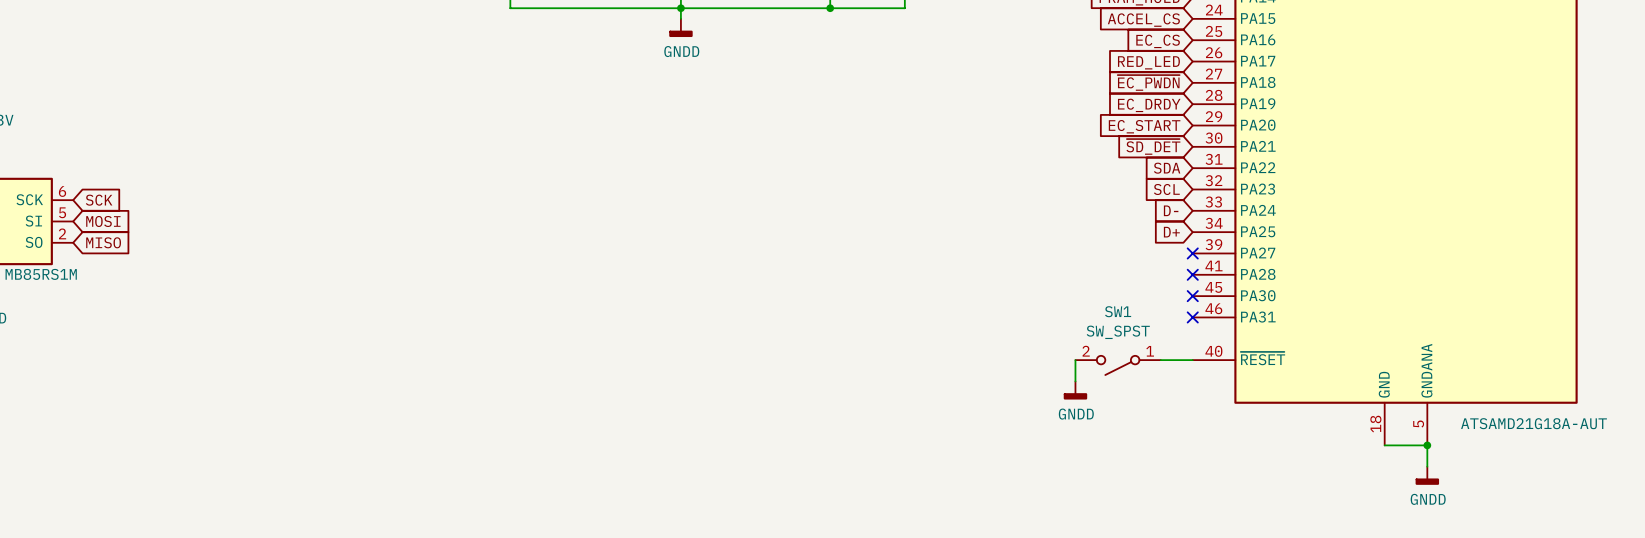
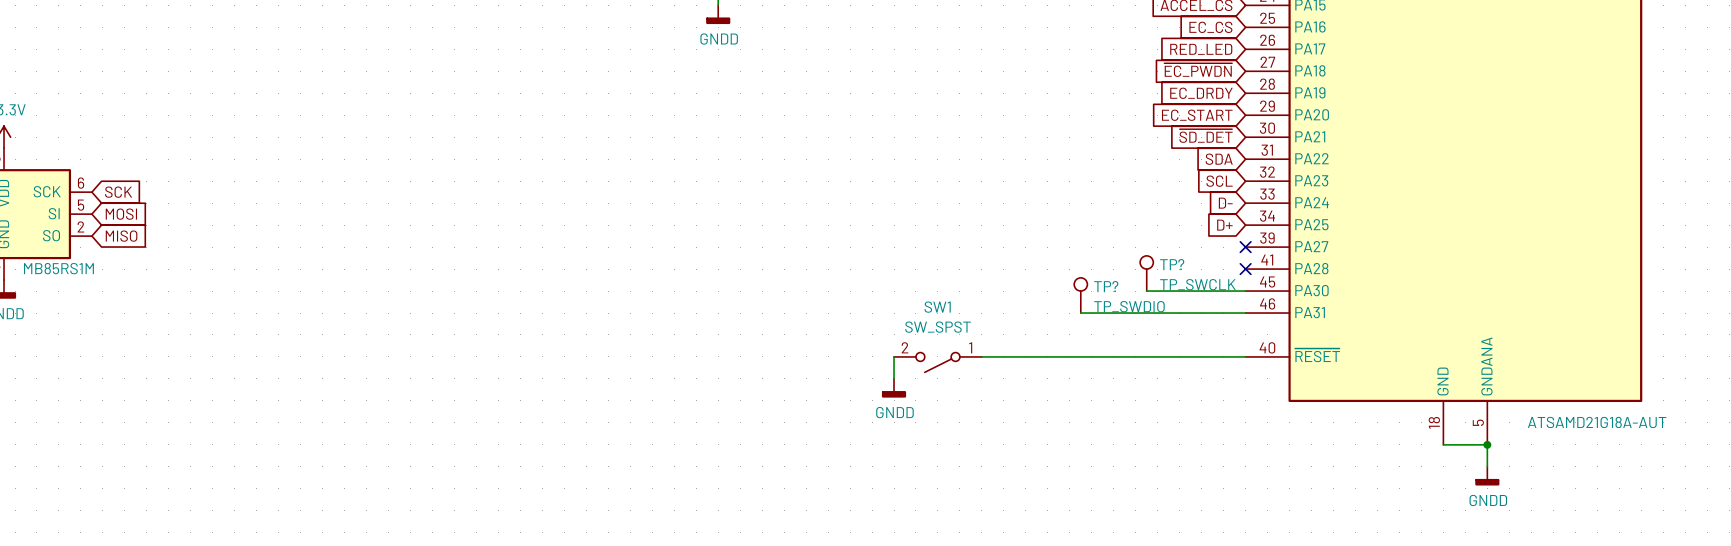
TP?: none -> TP_SWCLK (1146, 273)
wire: none -> (1146, 291) (1245, 291)
no-connect mark: (1192, 296) -> none
TP?: none -> TP_SWDIO (1080, 295)
wire: none -> (1080, 313) (1245, 313)
no-connect mark: (1192, 317) -> none
wire: none -> (894, 356) (894, 378)
wire: none -> (981, 356) (1212, 356)
wire: (1075, 360) (1075, 381) -> none
SW1 position: (1118, 365) -> (937, 362)
power symbol: none -> GNDD (894, 388)
power symbol: GNDD (1075, 390) -> none

